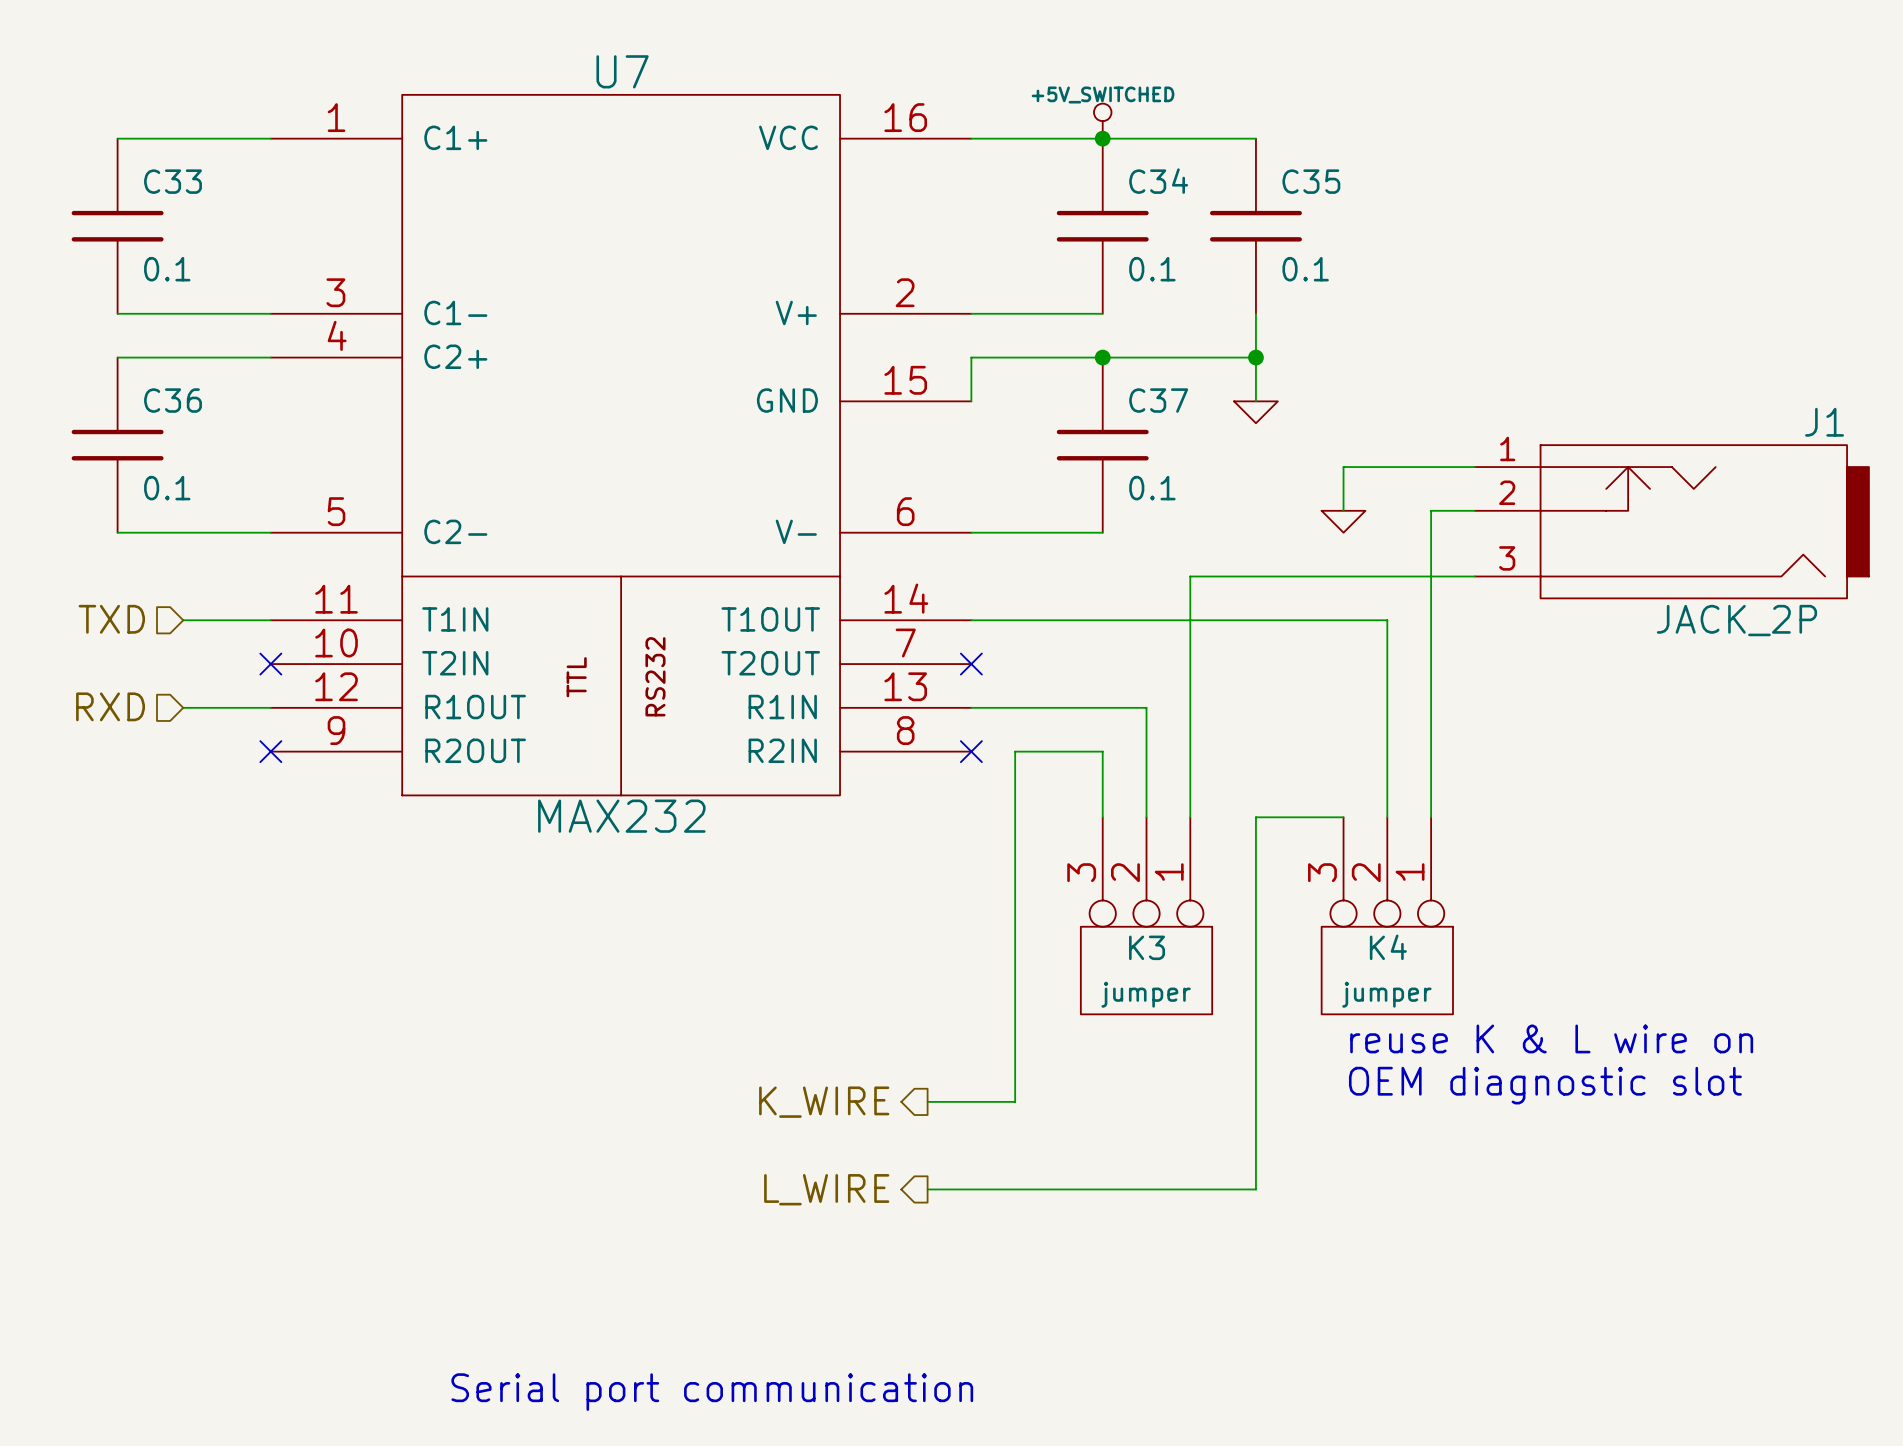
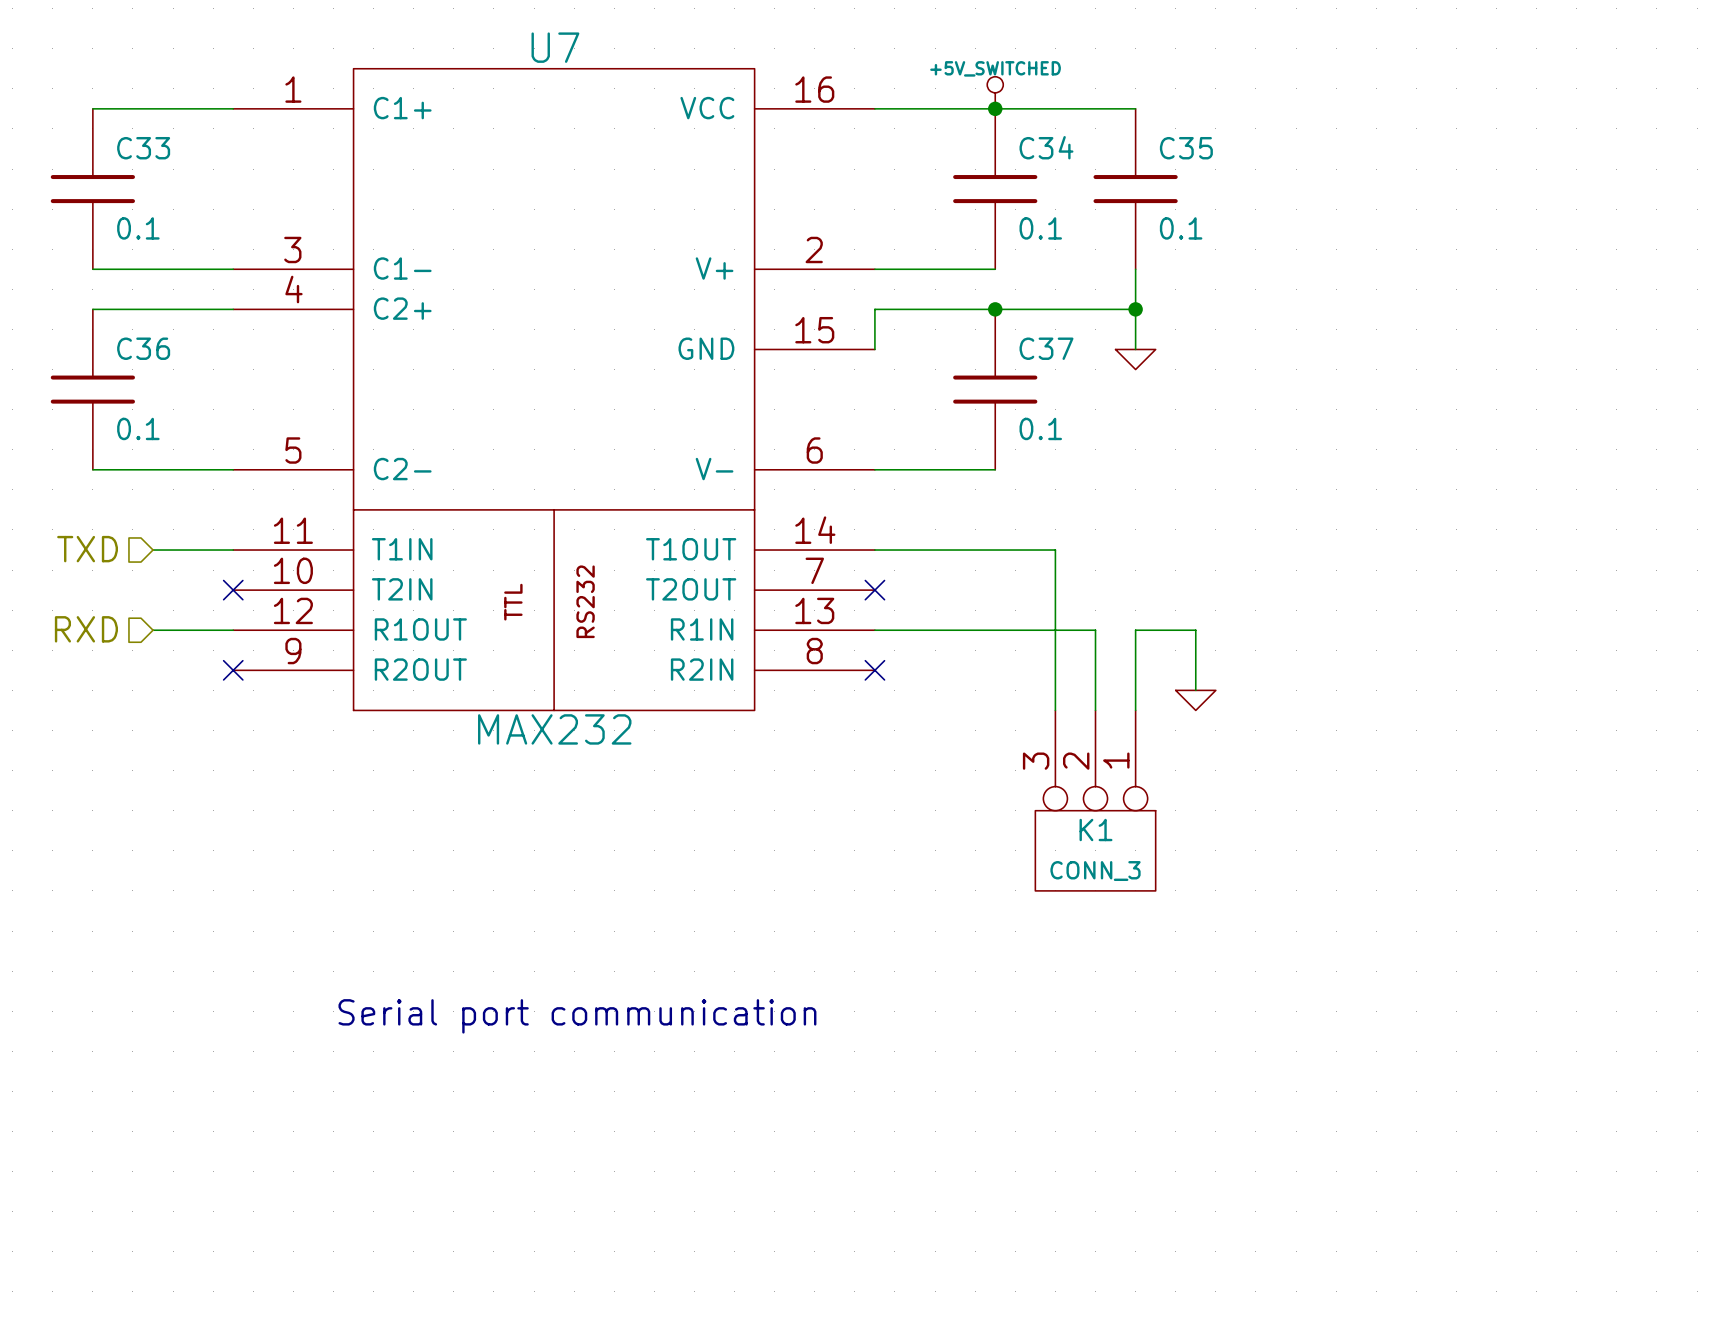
wire: (1474, 467) (1343, 467) (1343, 510) -> none
wire: (1474, 510) (1431, 510) (1431, 817) -> none
power symbol position: (1343, 521) -> (1195, 700)
J1: JACK_2P (1671, 521) -> none
wire: (1474, 576) (1190, 576) (1190, 817) -> none
wire: (1168, 620) (1387, 620) (1387, 817) -> (1055, 550) (1055, 710)
wire: (1146, 707) (1146, 817) -> (1035, 630) (1095, 630) (1095, 710)
wire: none -> (1195, 690) (1195, 630) (1135, 630) (1135, 710)
wire: (1102, 817) (1102, 751) (1015, 751) (1015, 1101) (927, 1101) -> none
wire: (1343, 817) (1255, 817) (1255, 1189) (927, 1189) -> none
K1: none -> CONN_3 (1095, 800)
K3: jumper (1146, 915) -> none
K4: jumper (1387, 915) -> none
text: reuse K & L wire on (1551, 1038) -> none
text: OEM diagnostic slot (1545, 1085) -> none
hierarchical label: K_WIRE (824, 1102) -> none
hierarchical label: L_WIRE (826, 1189) -> none
text position: Serial port communication (712, 1392) -> Serial port communication (577, 1016)

